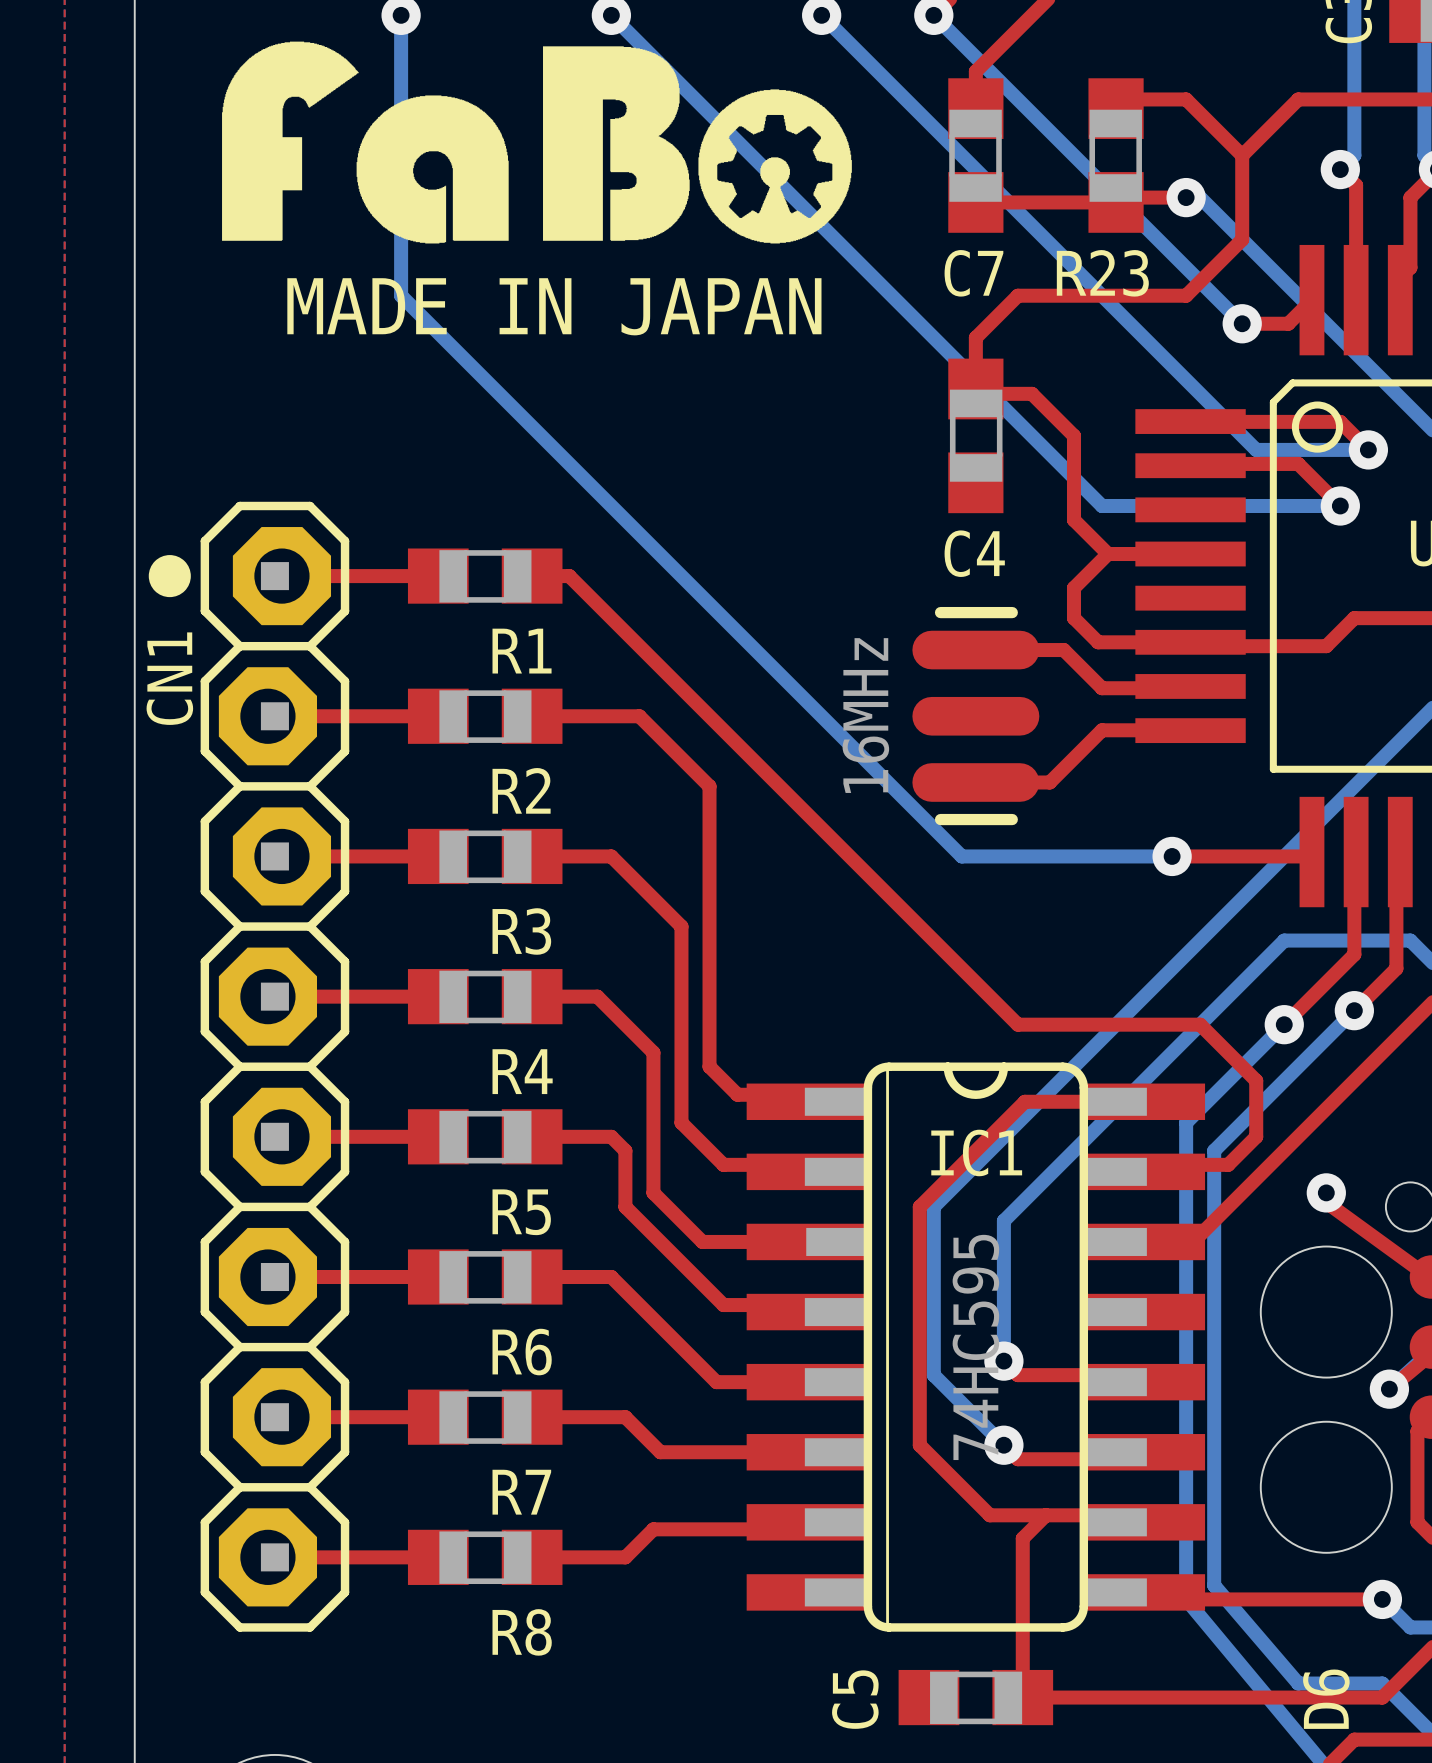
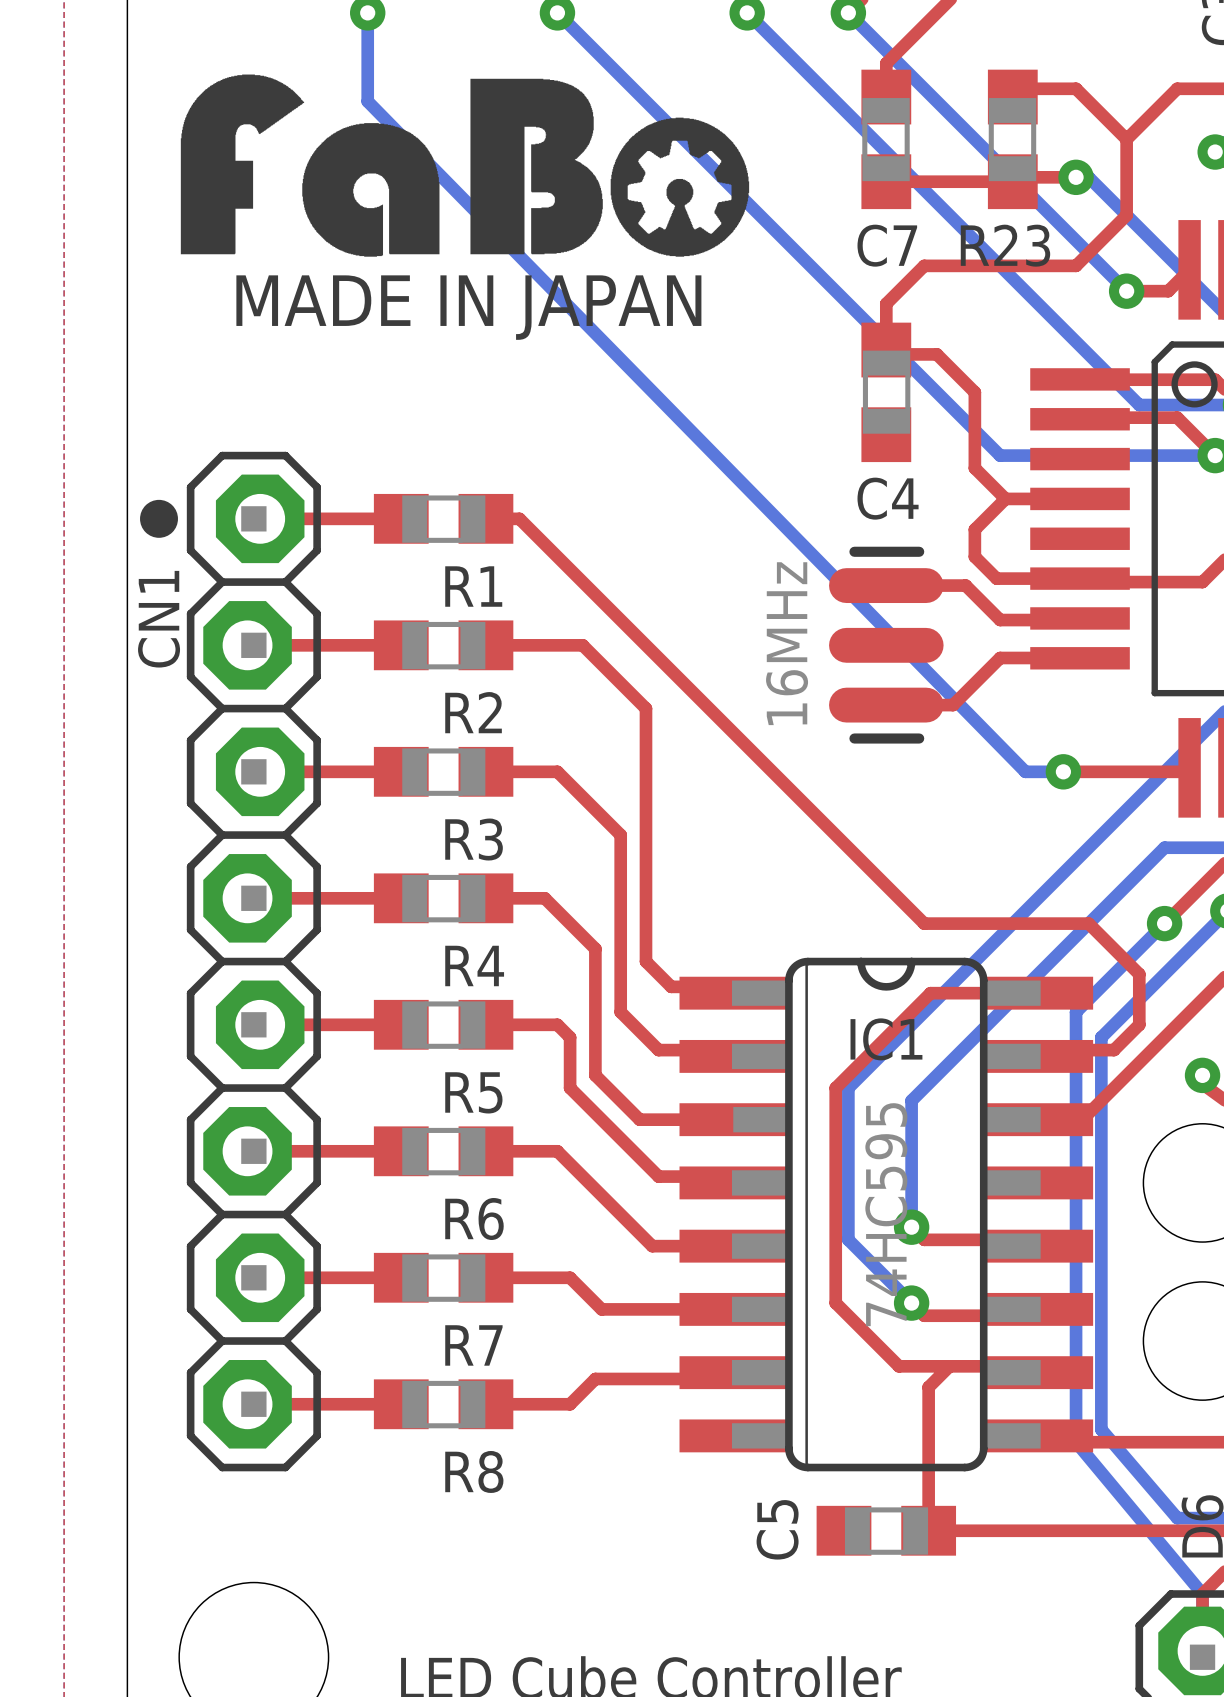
bottom track: (401, 113) (401, 295) (961, 856) (1130, 856) -> (367, 101) (1025, 771)
drawing position: (536, 142) -> (464, 165)
text position: MADE IN JAPAN (554, 306) -> MADE IN JAPAN (468, 307)

